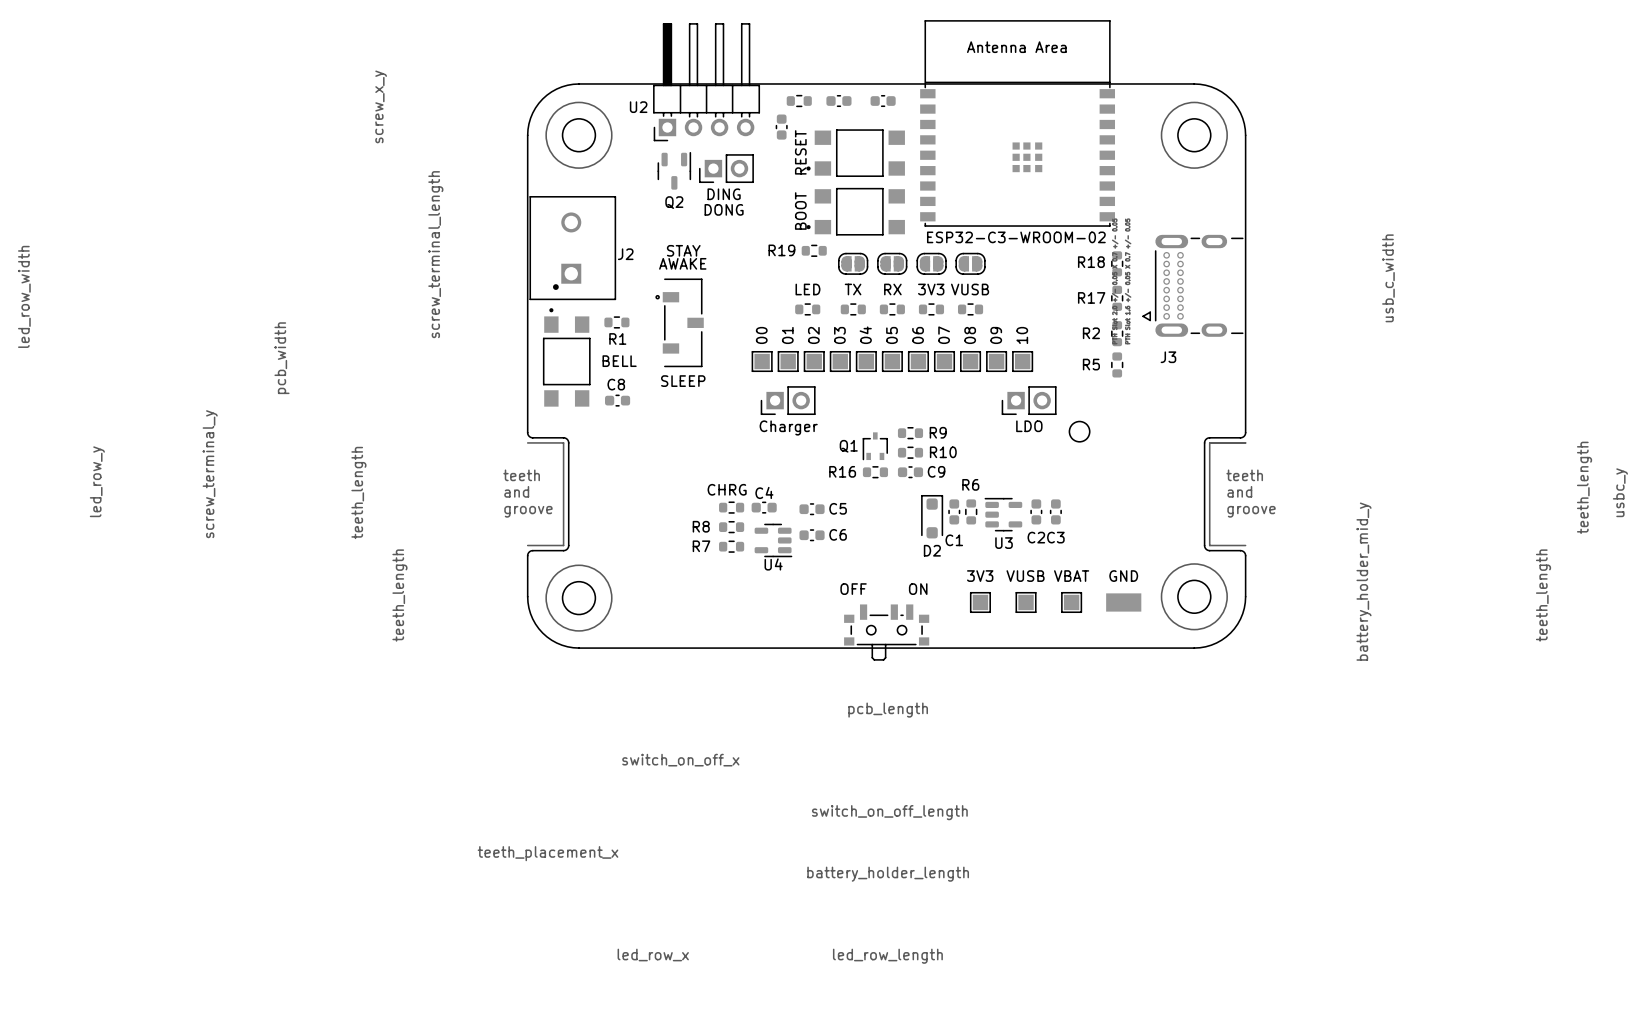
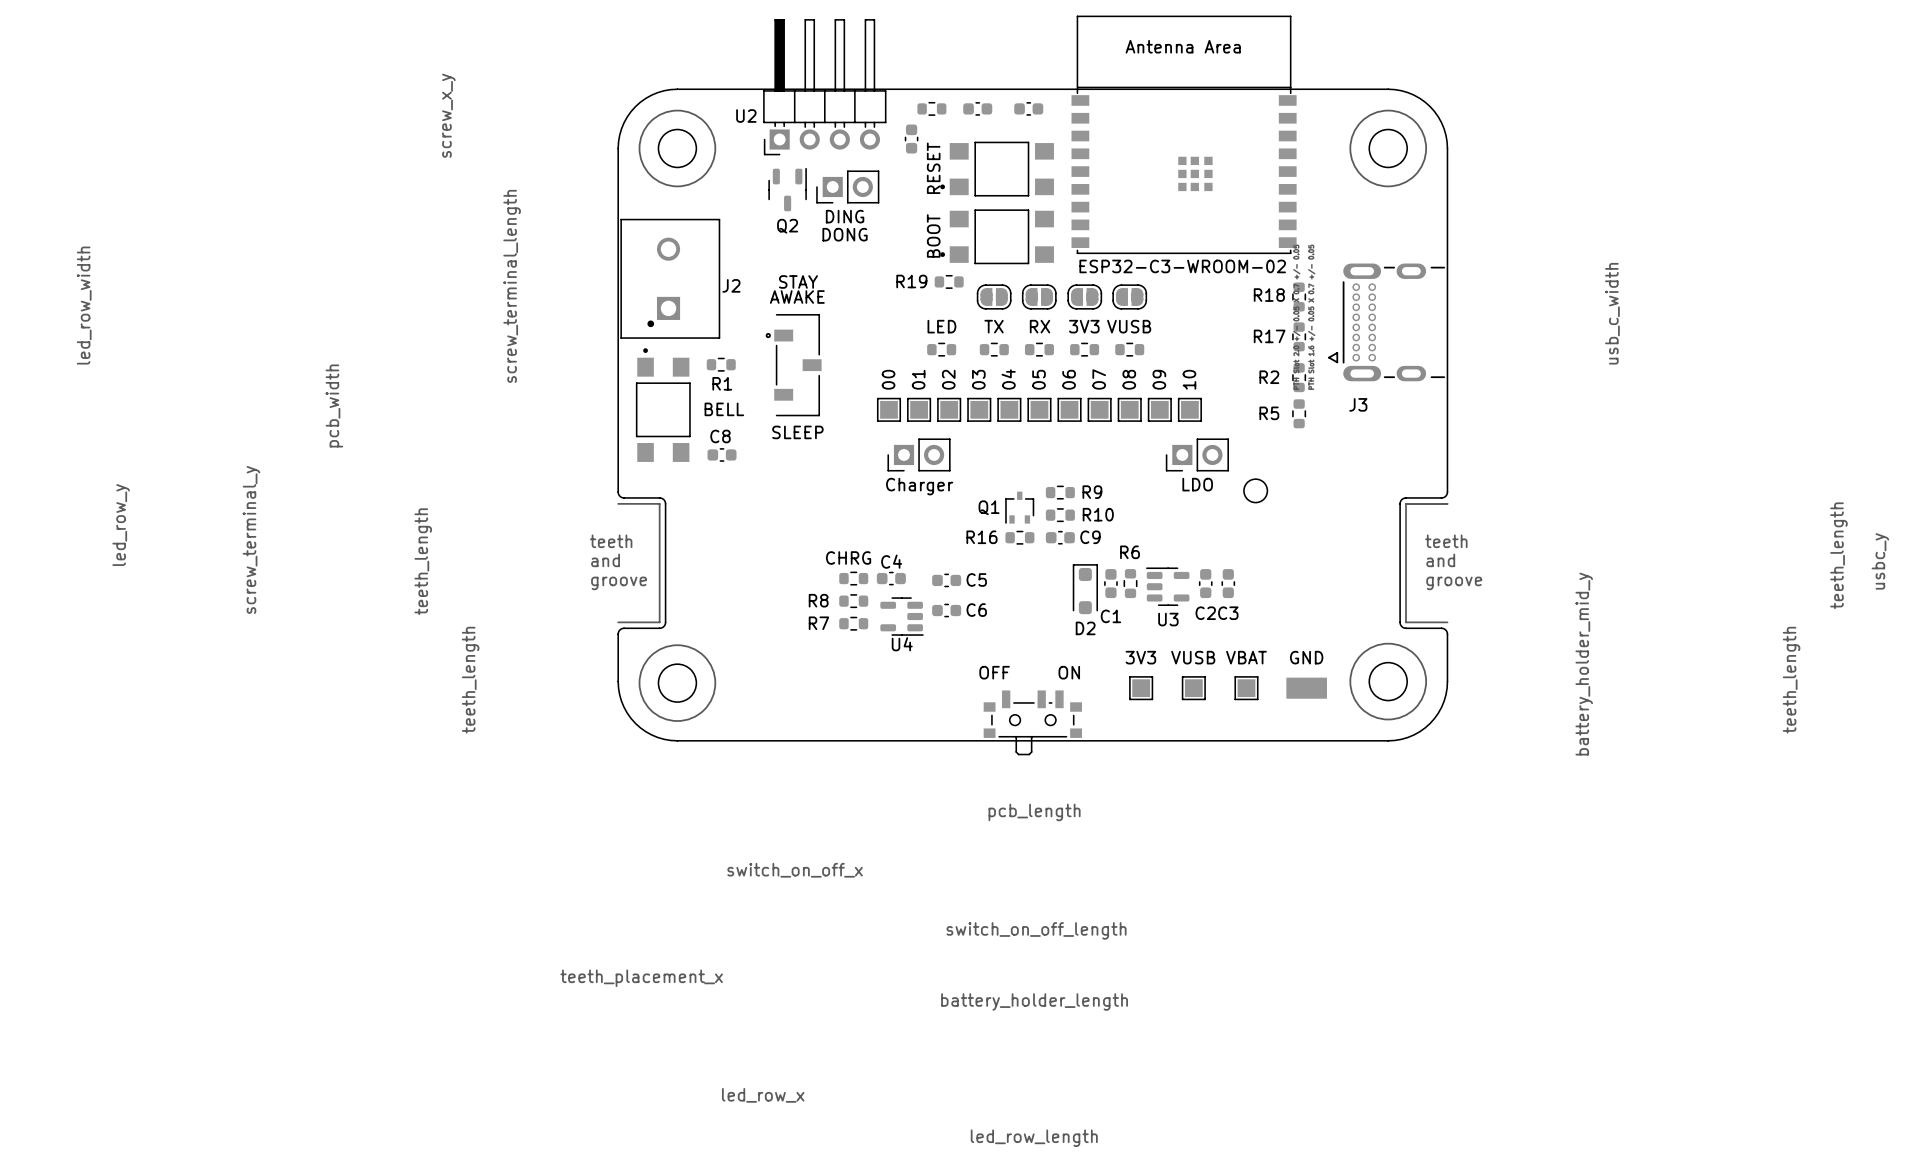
text position: led_row_width (24, 296) -> led_row_width (84, 305)
text position: led_row_y (97, 481) -> led_row_y (121, 525)
text position: led_row_length (887, 956) -> led_row_length (1034, 1138)

